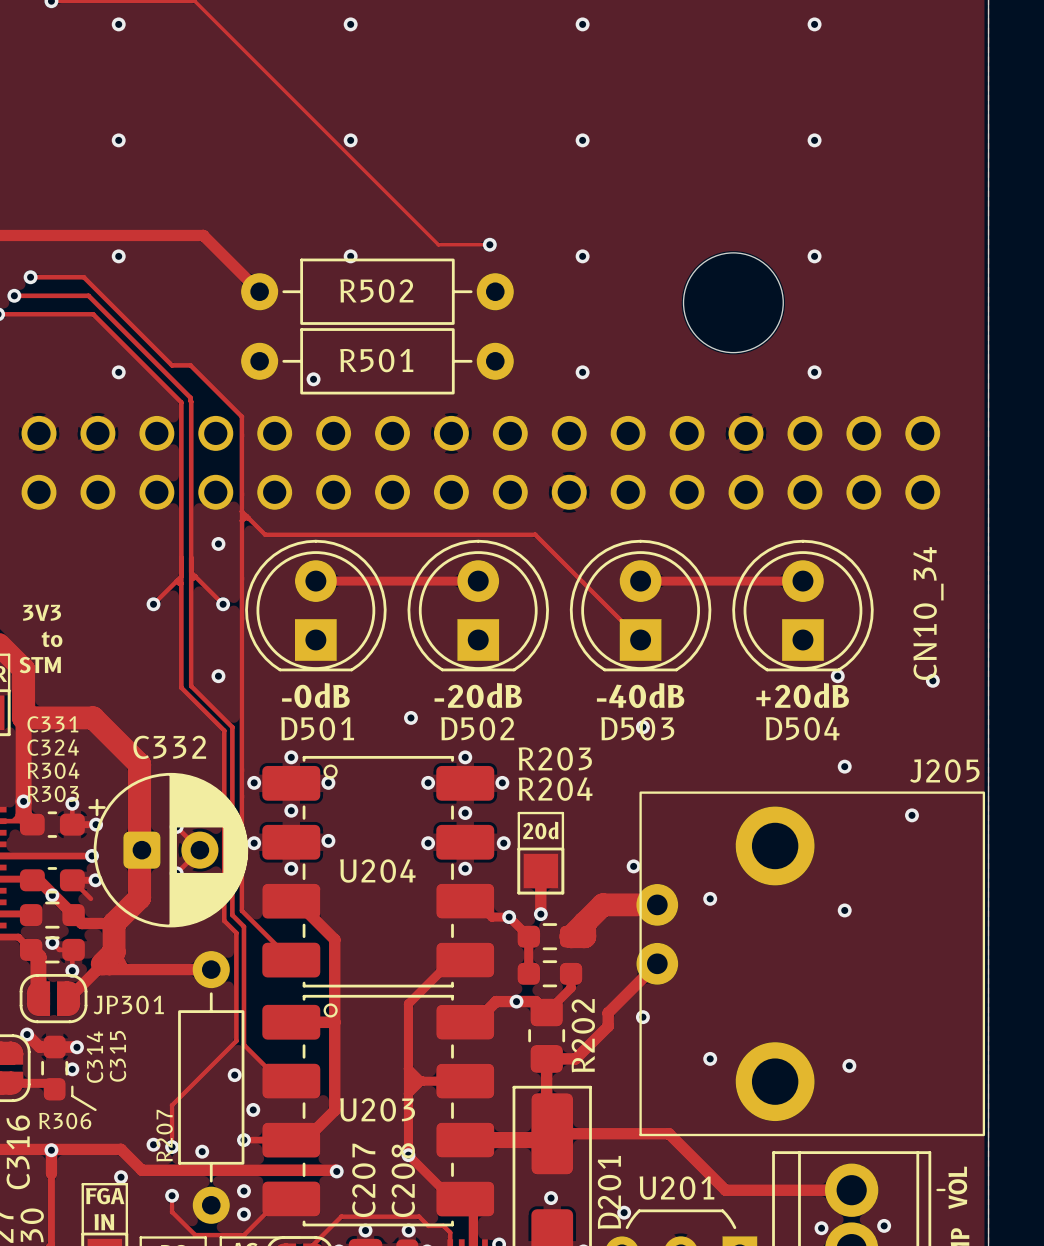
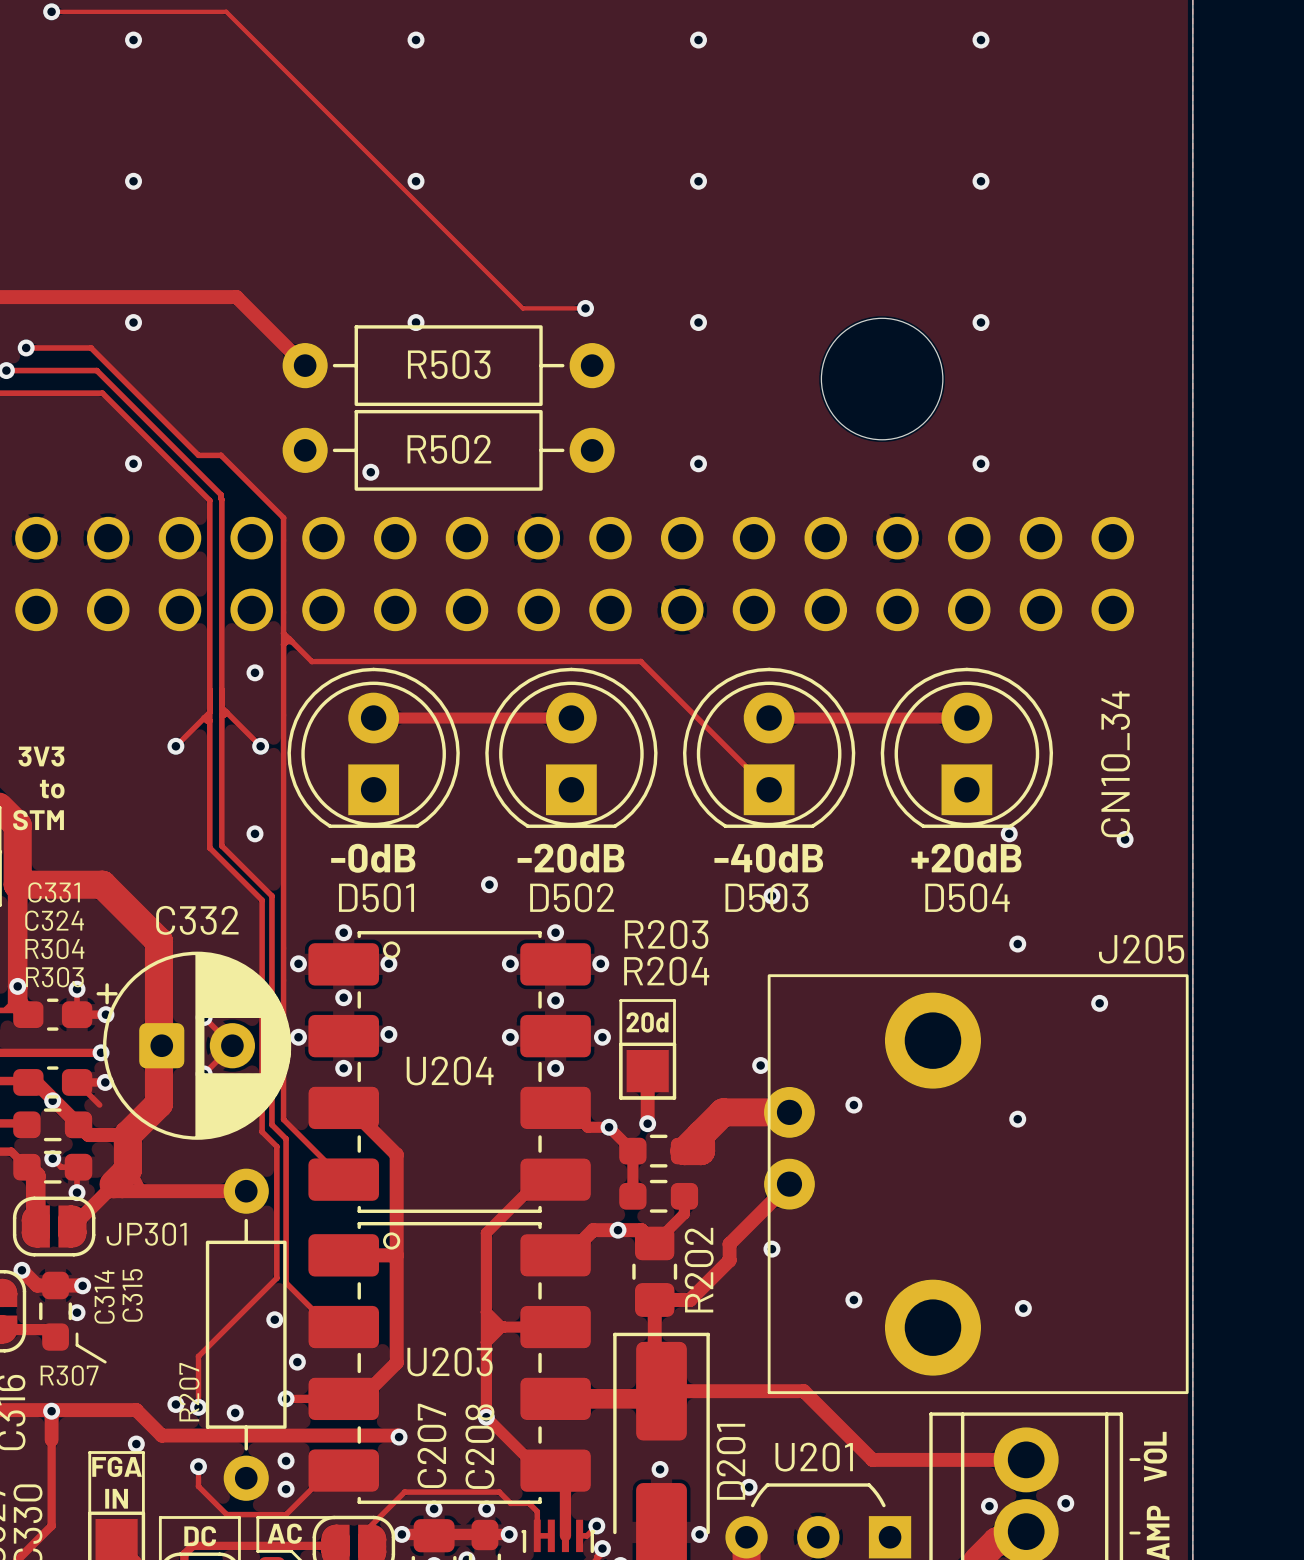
R502 name: R502 (376, 291) -> R503 (449, 364)
R501 name: R501 (376, 360) -> R502 (449, 449)
R306 name: R306 (65, 1121) -> R307 (69, 1375)

